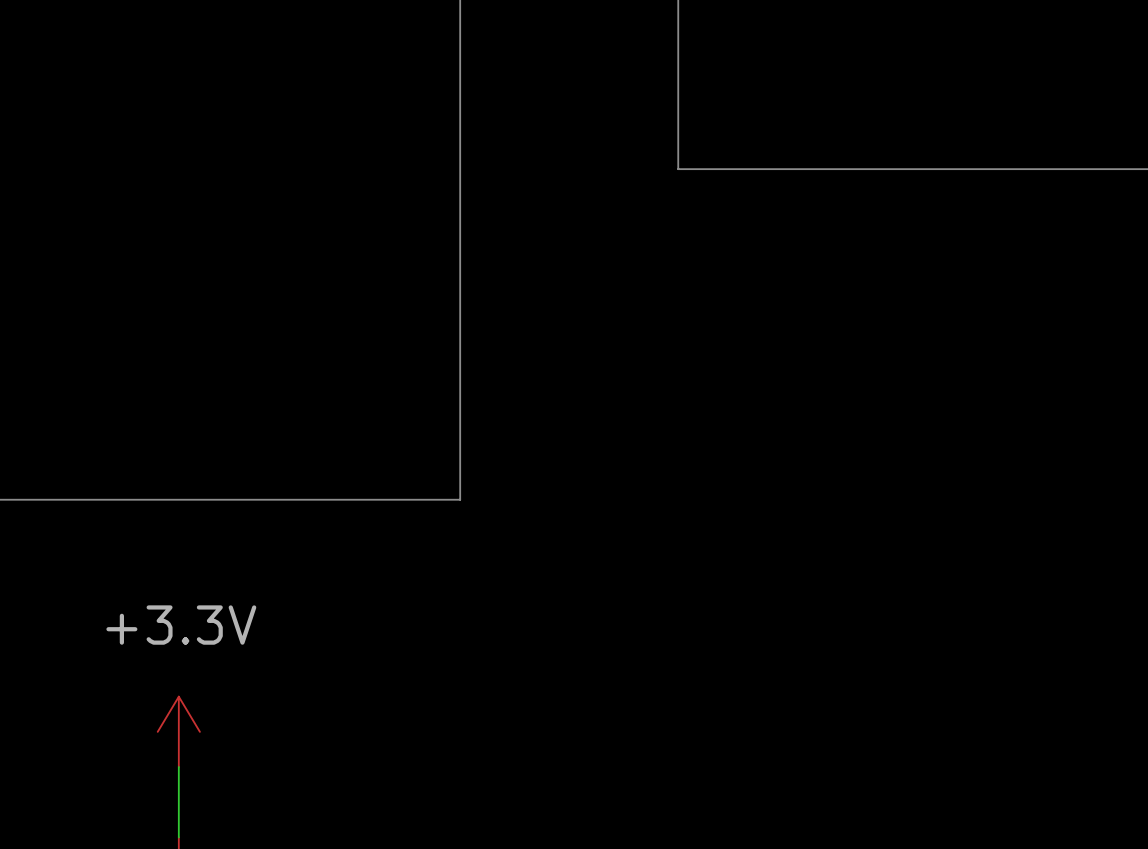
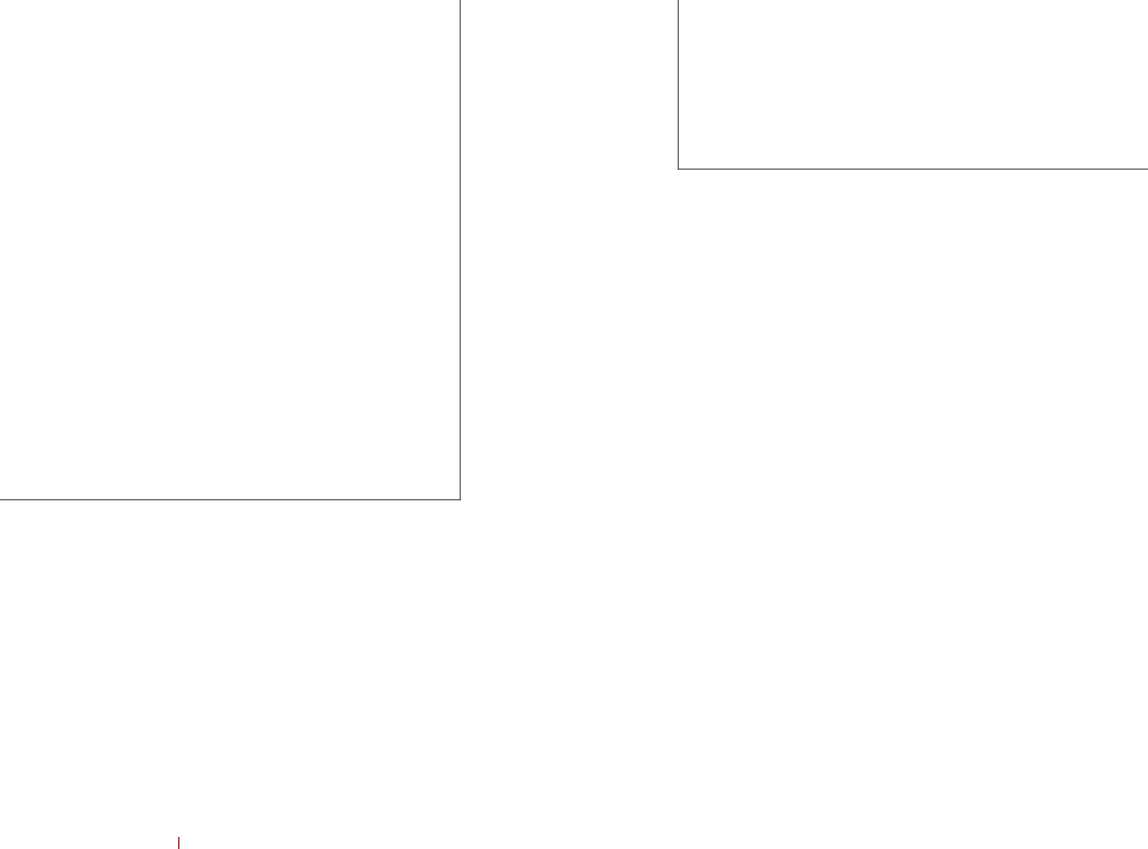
power symbol: +3.3V (178, 731) -> none
wire: (178, 767) (178, 837) -> none

